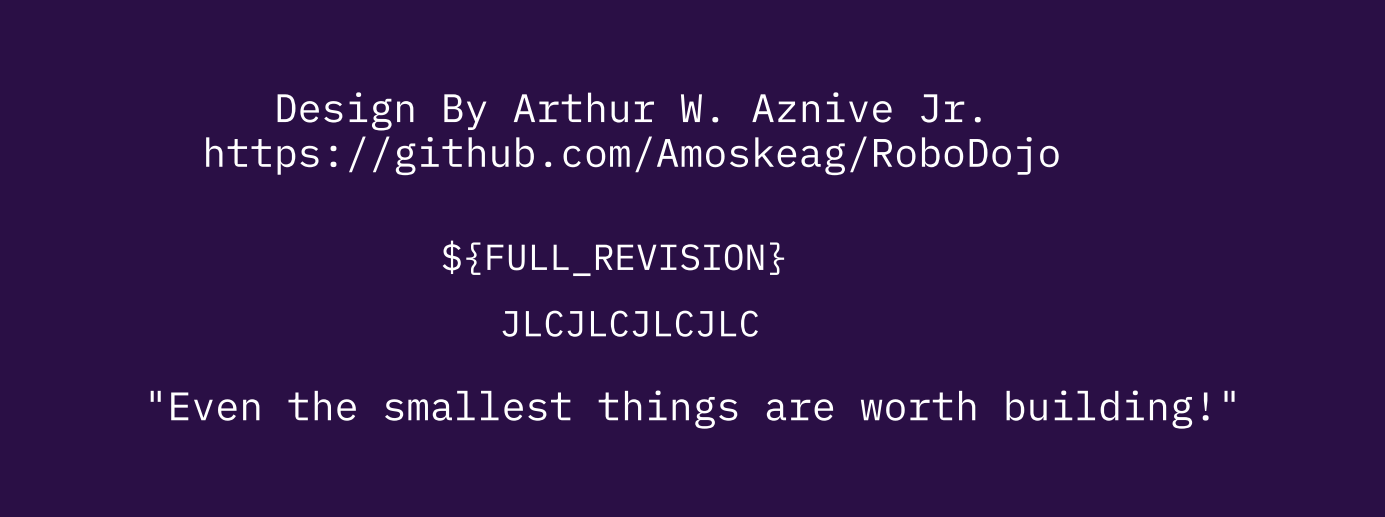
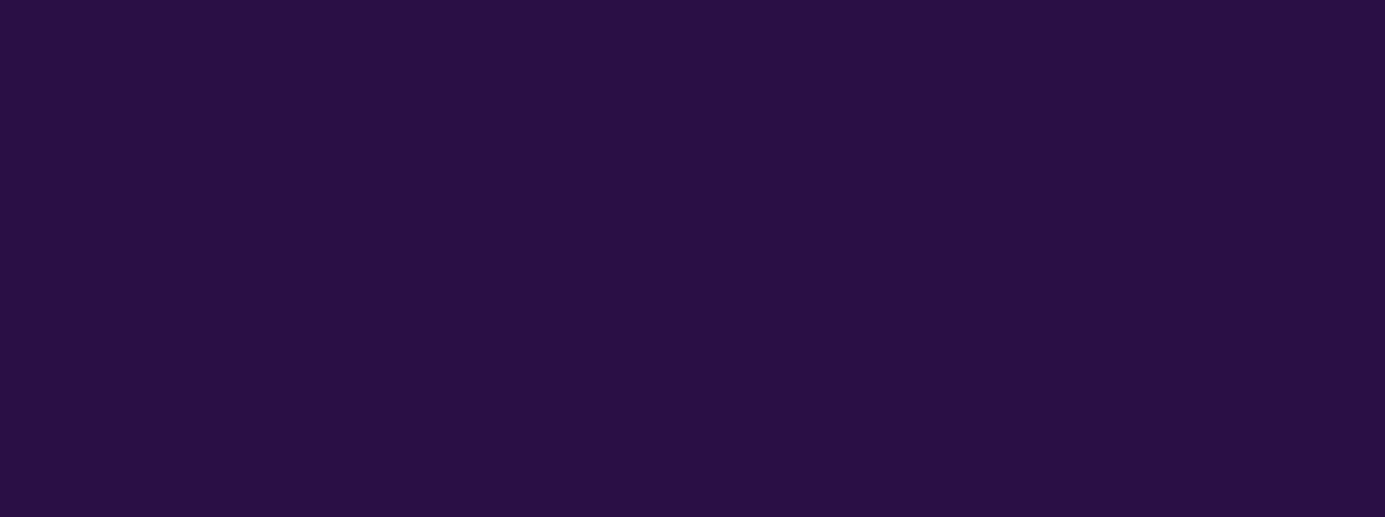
text: Design By Arthur W. Aznive Jr. (629, 111) -> none
text: https://github.com/Amoskeag/RoboDojo (632, 155) -> none
text: ${FULL_REVISION} (613, 258) -> none
text: JLCJLCJLCJLC (630, 323) -> none
text: "Even the smallest things are worth building!" (692, 409) -> none

